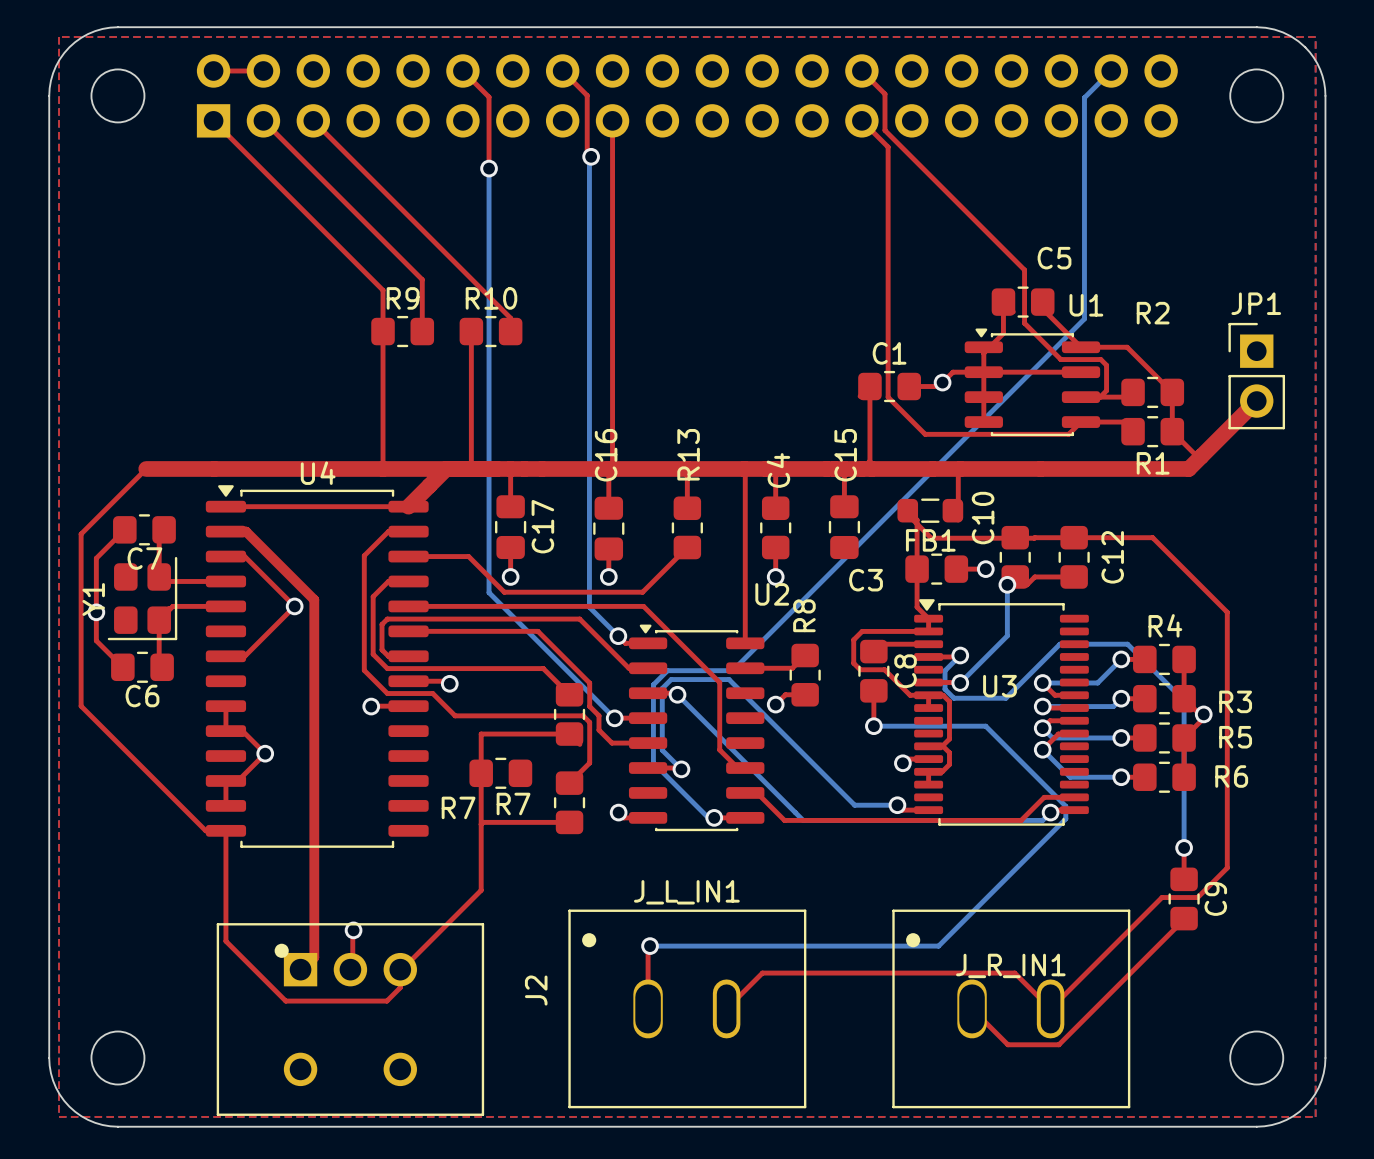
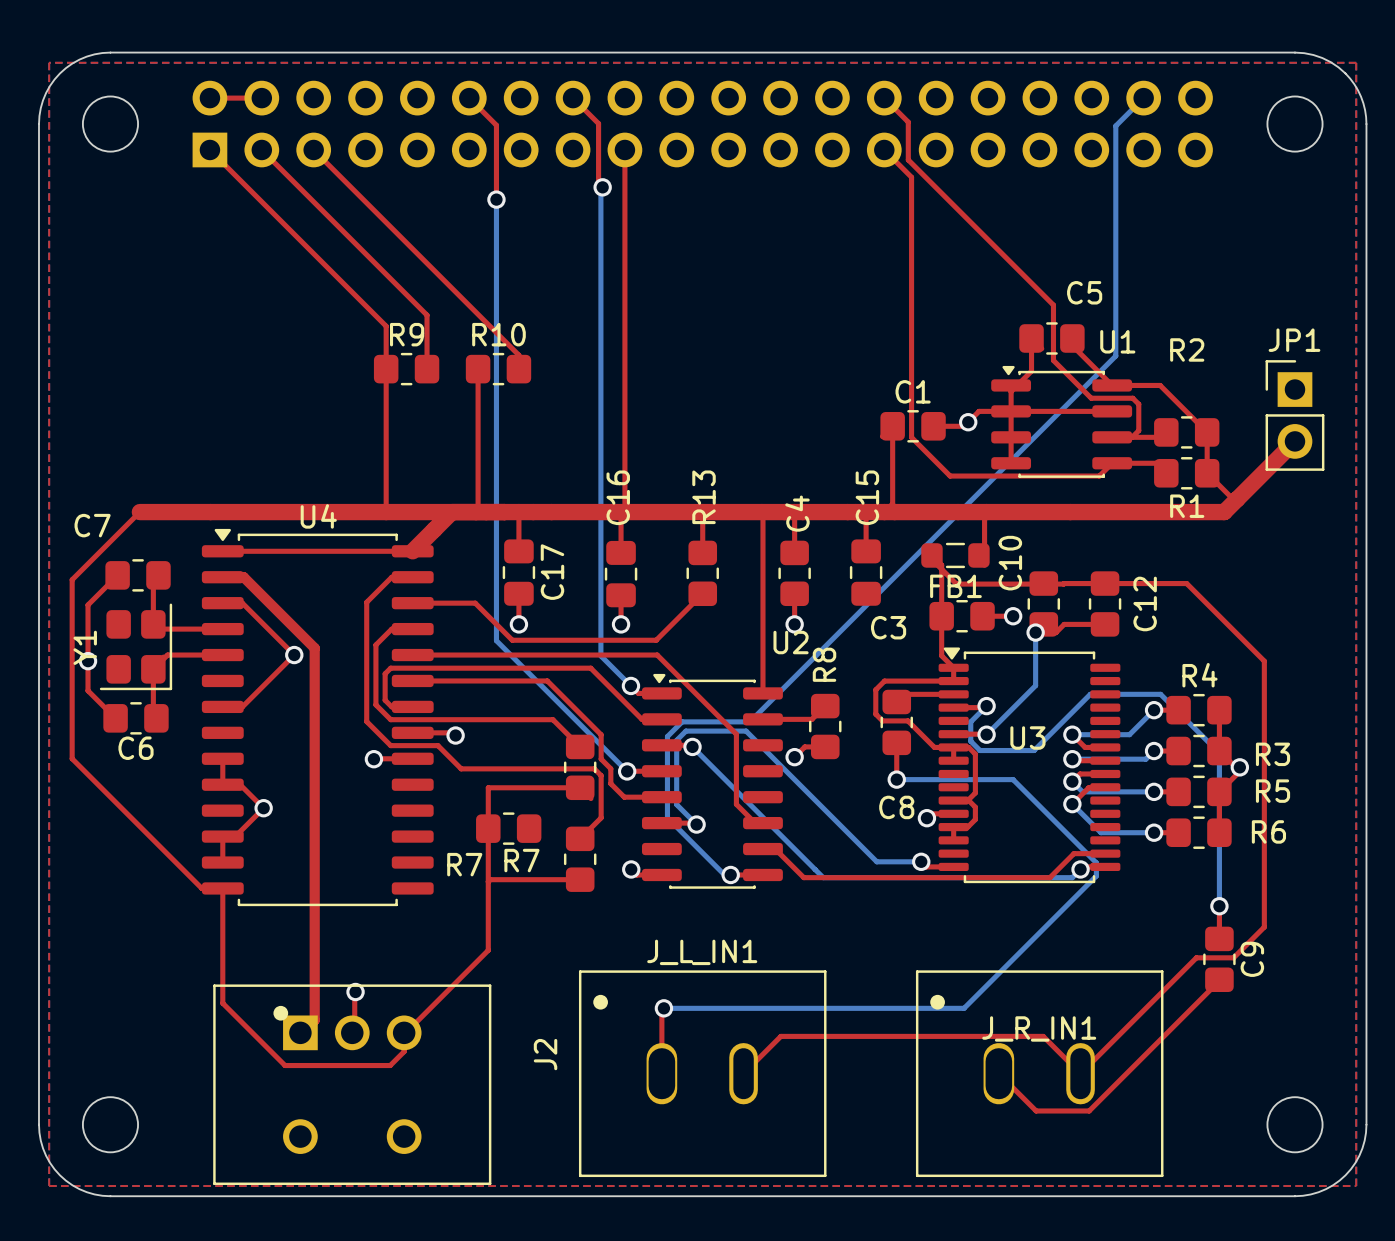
C7 name position: C7 (144, 558) -> C7 (92, 525)
C8 name rotation: 0° (905, 671) -> 90° clockwise (896, 807)
C8 name position: C8 (905, 671) -> C8 (896, 807)

